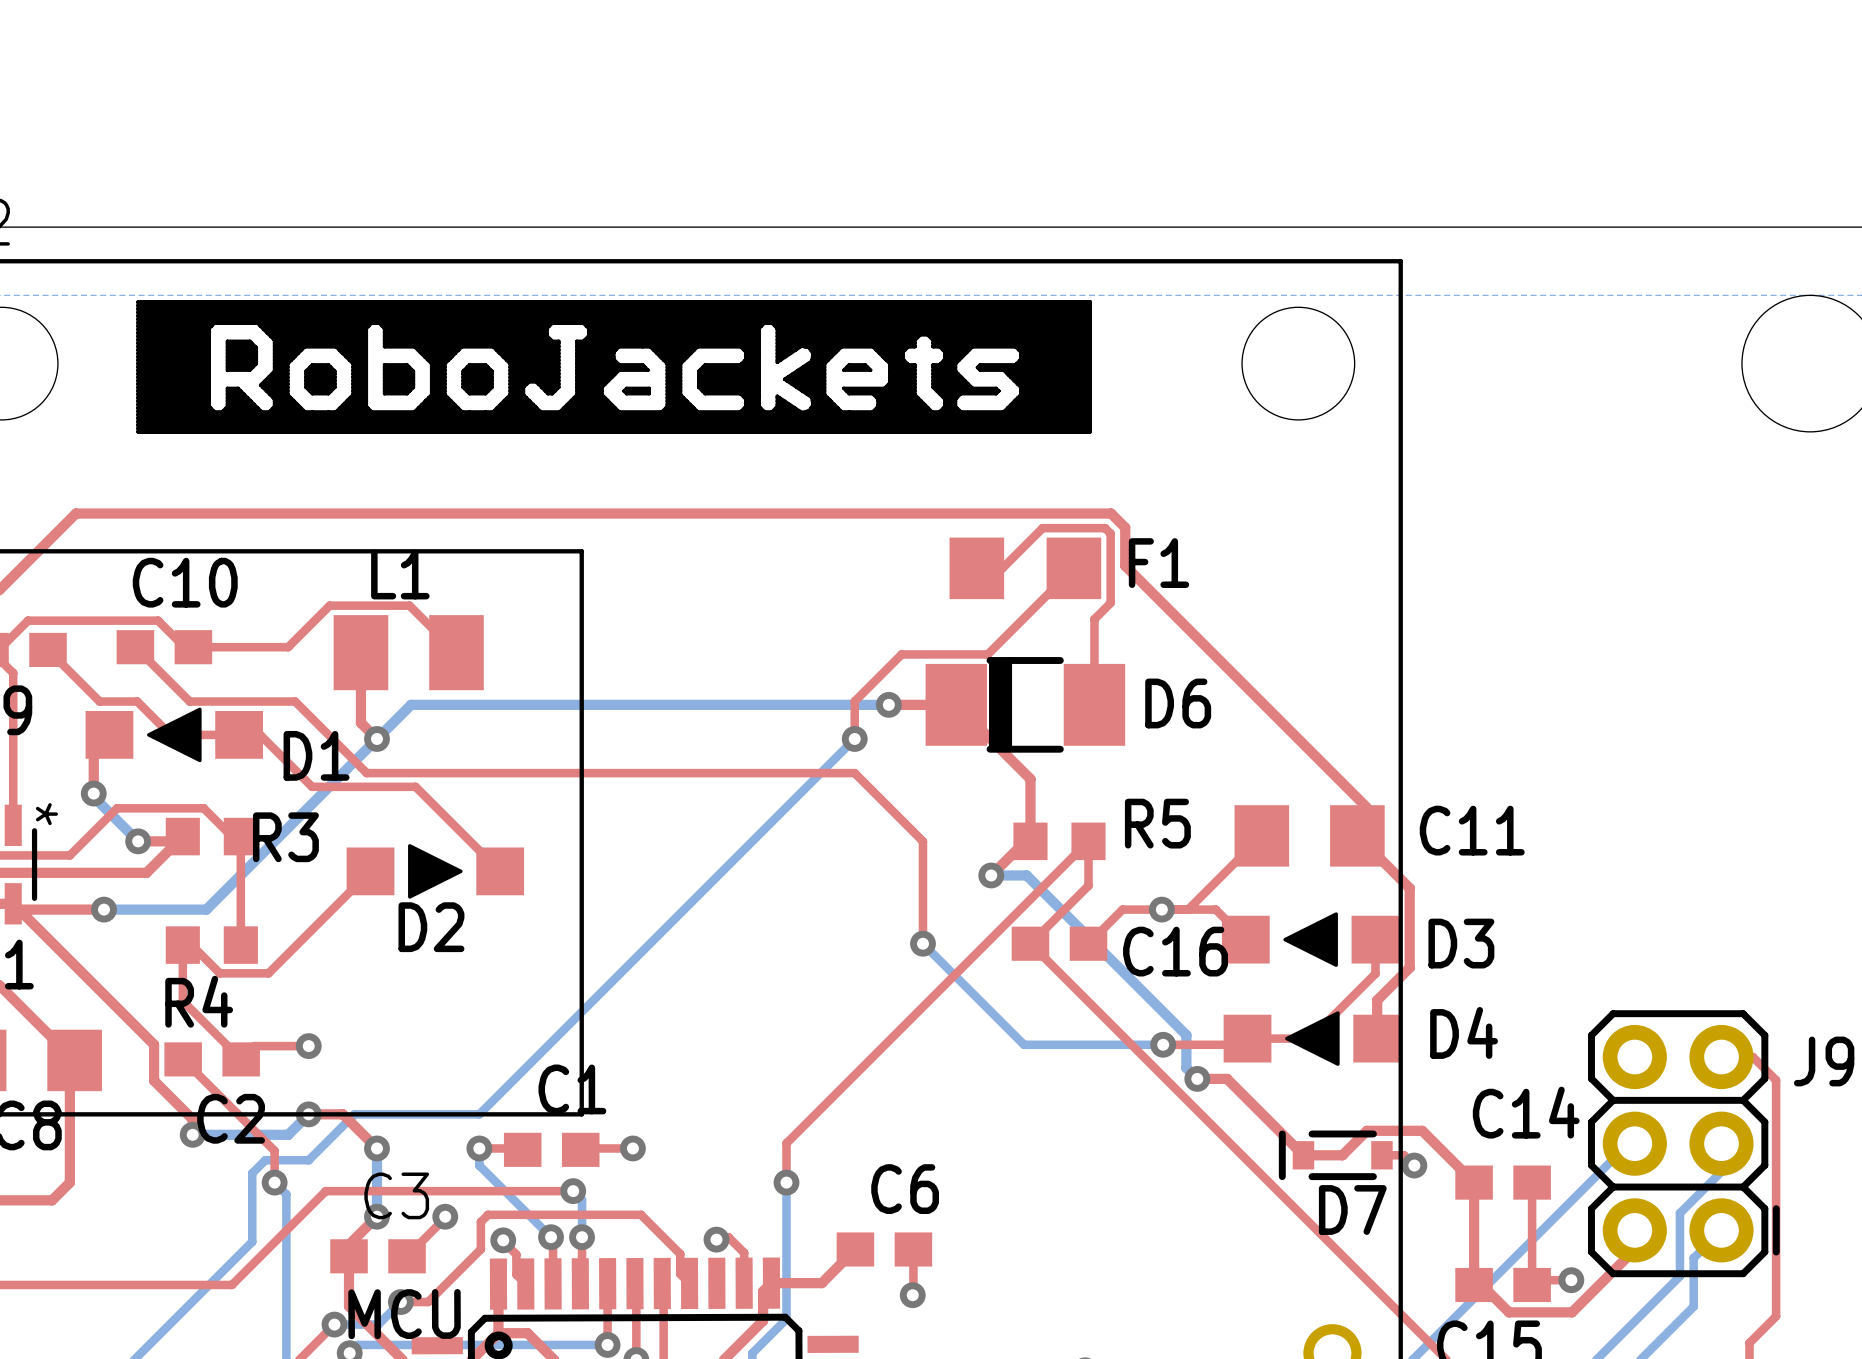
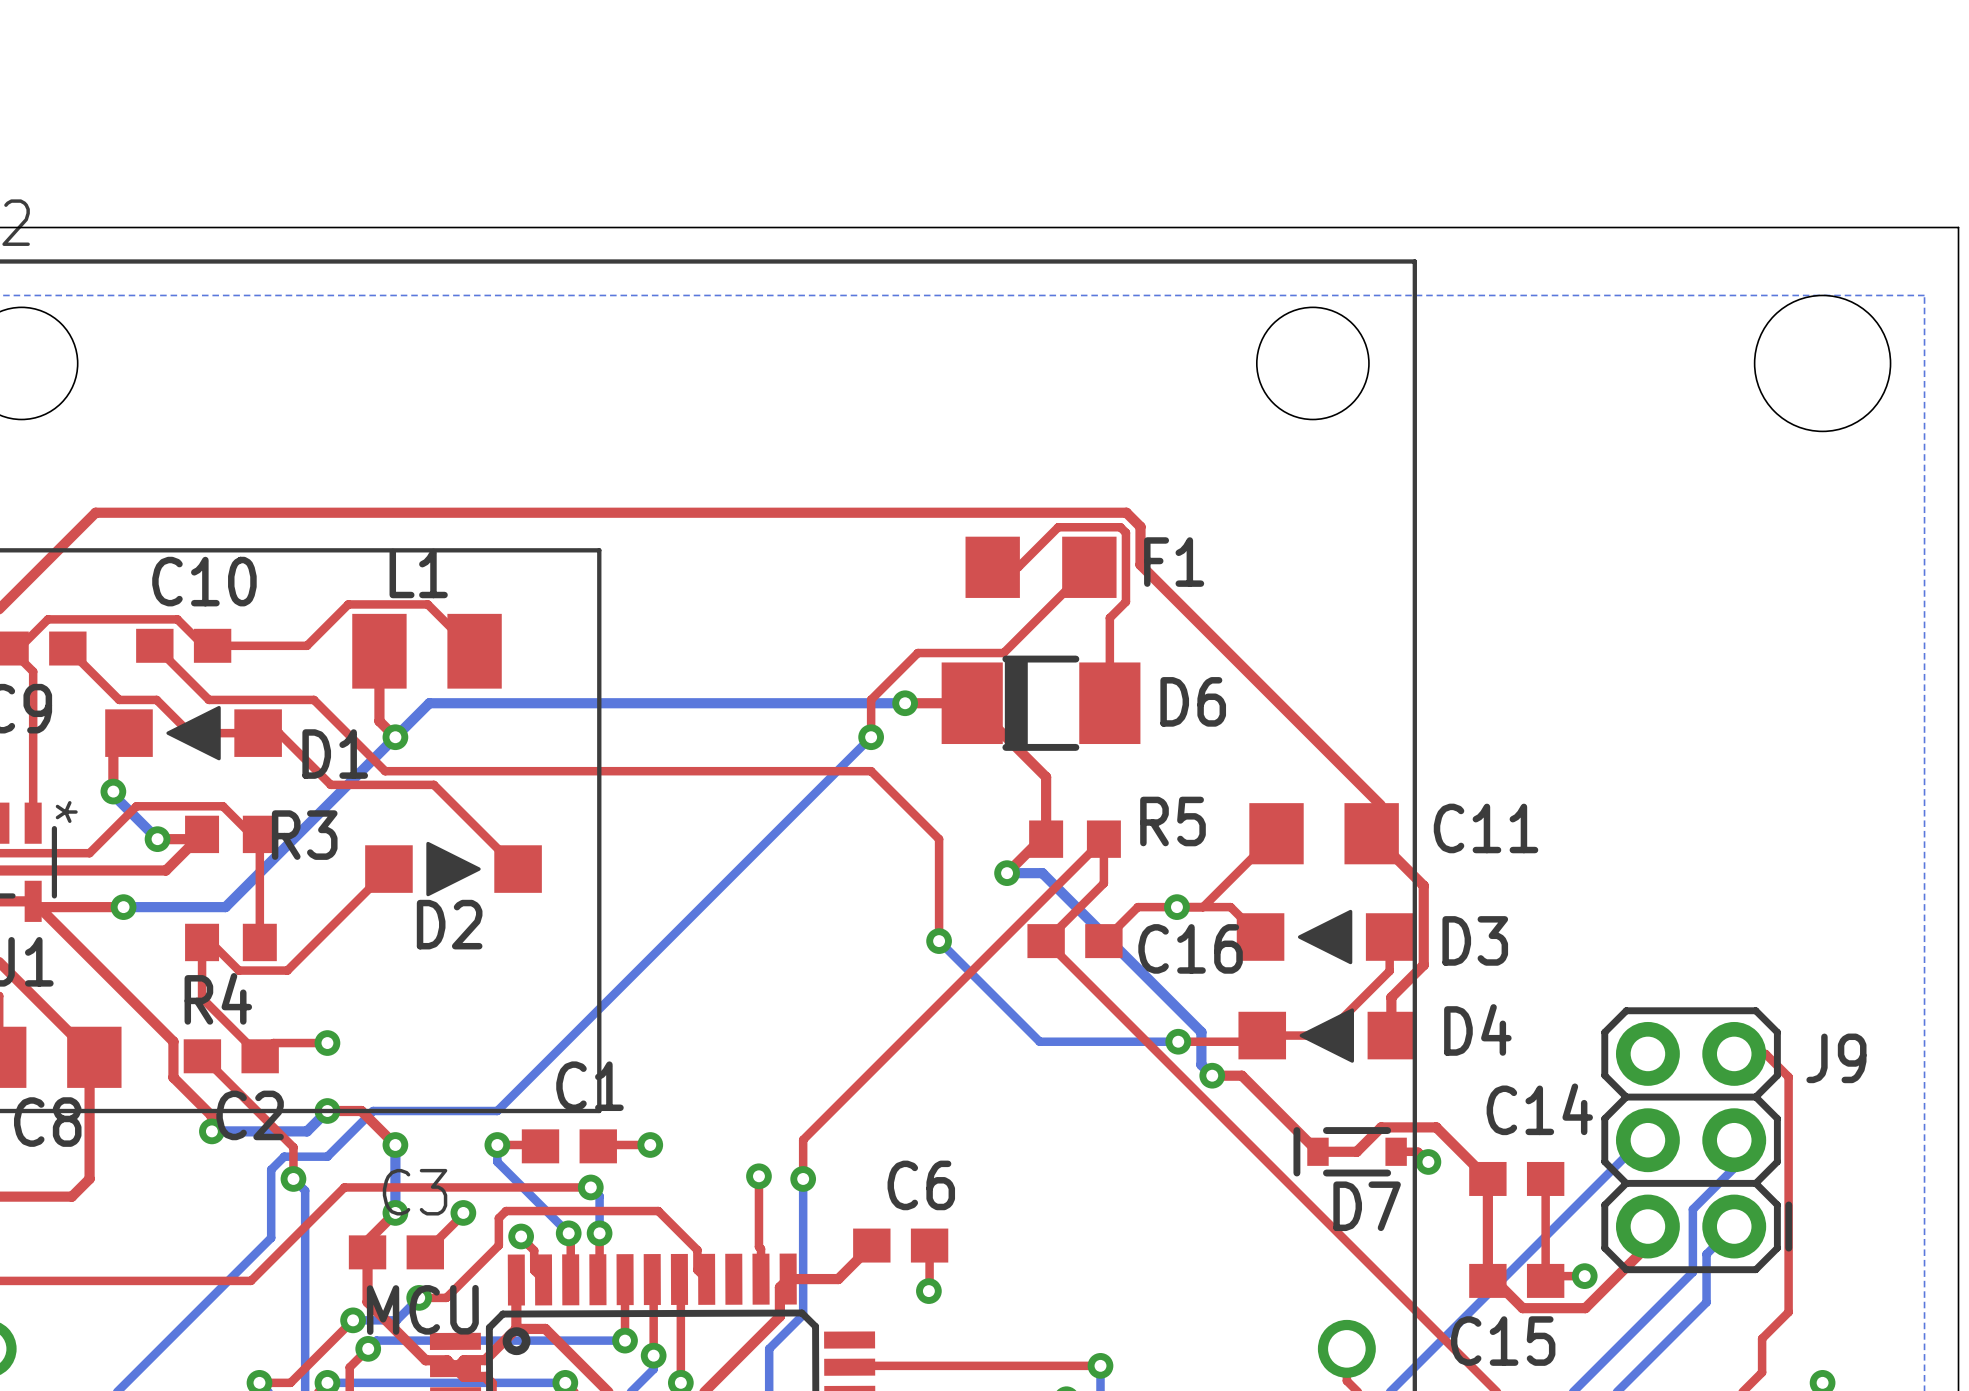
drawing: [136, 300, 1092, 434] -> none
top track: (716, 1239) (718, 1237) (728, 1237) (742, 1250) -> (758, 1176) (758, 1246)
via position: (716, 1239) -> (758, 1176)

